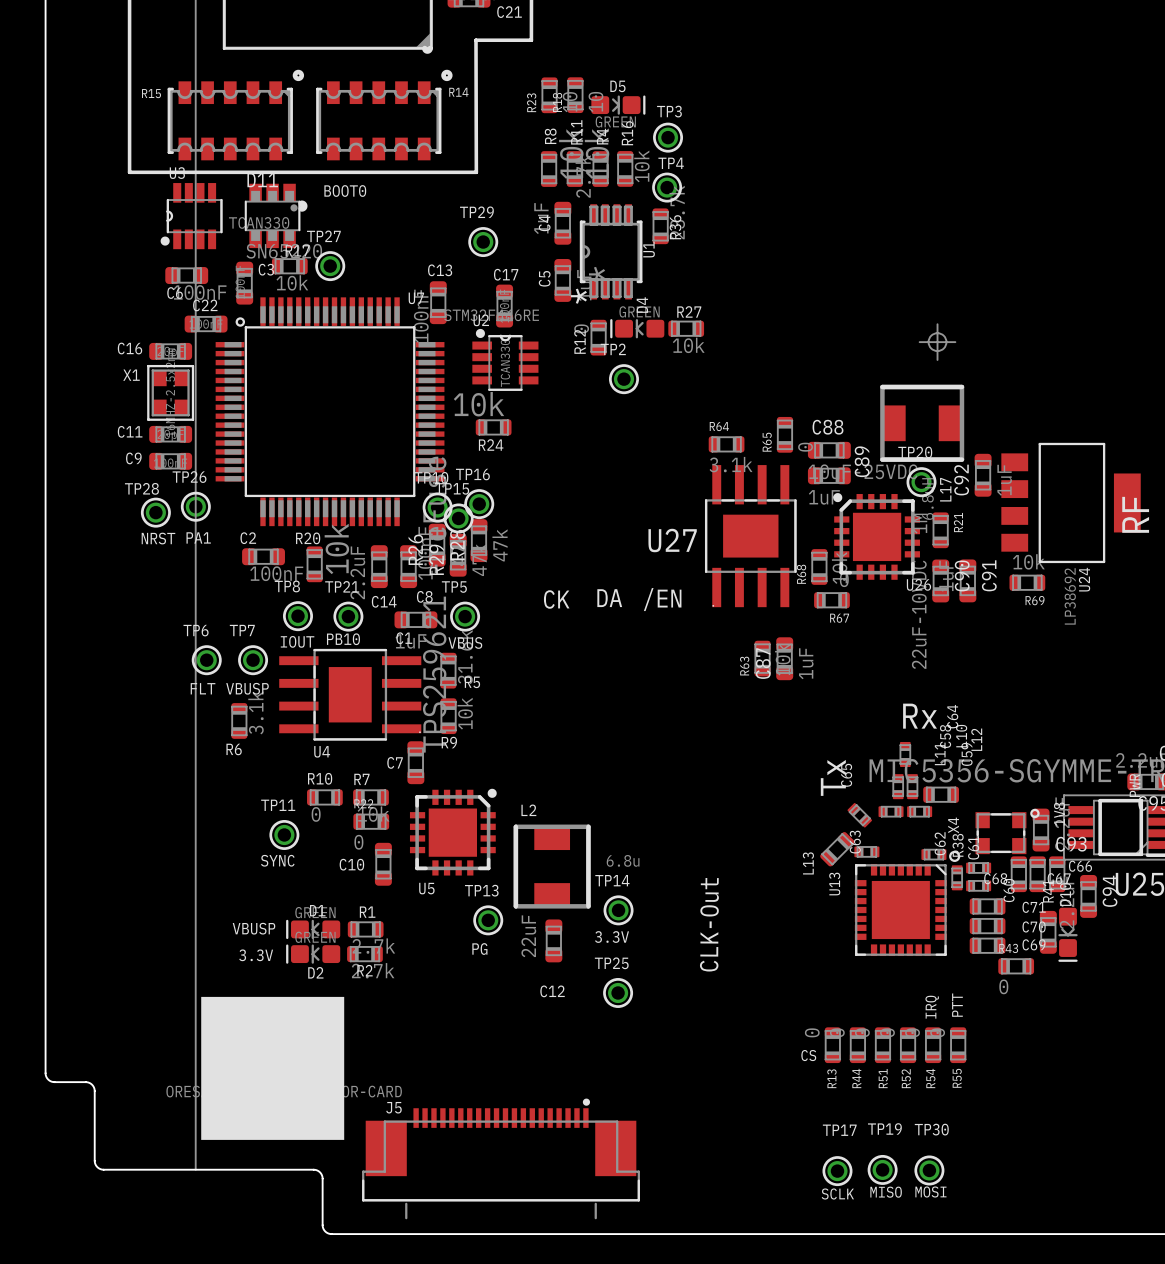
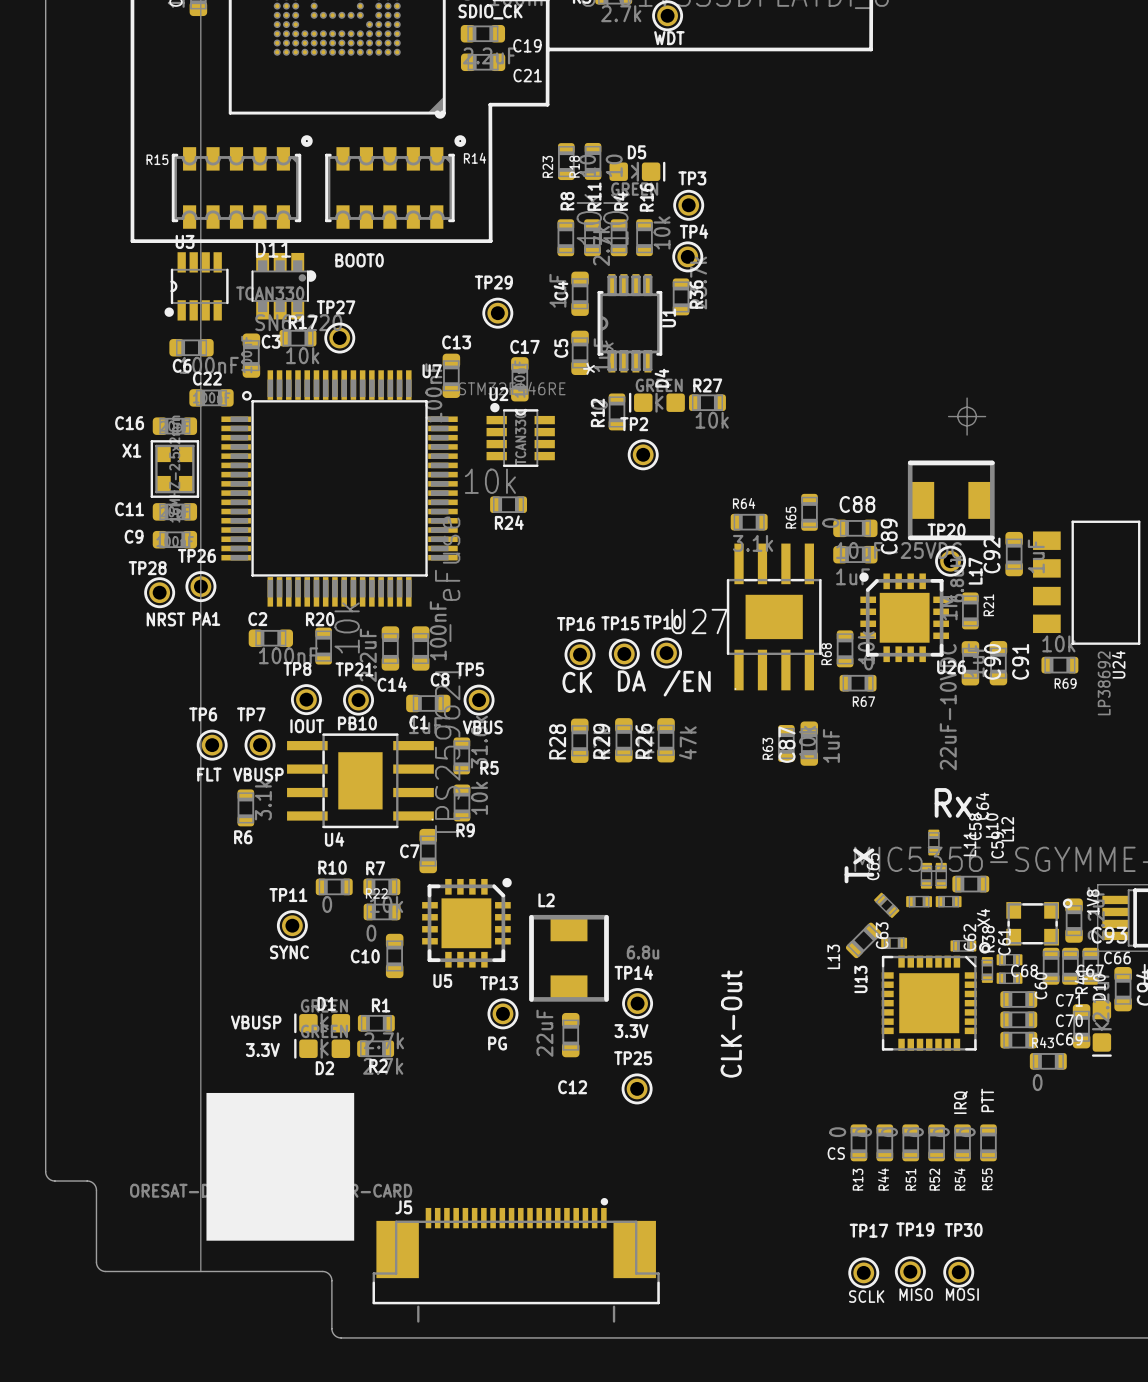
TP16 position: (479, 504) -> (580, 654)
TP10 position: (437, 507) -> (666, 653)
TP15 position: (458, 518) -> (624, 653)
R28 position: (479, 540) -> (579, 740)
R26 position: (437, 545) -> (666, 740)
R29 position: (458, 555) -> (623, 740)

